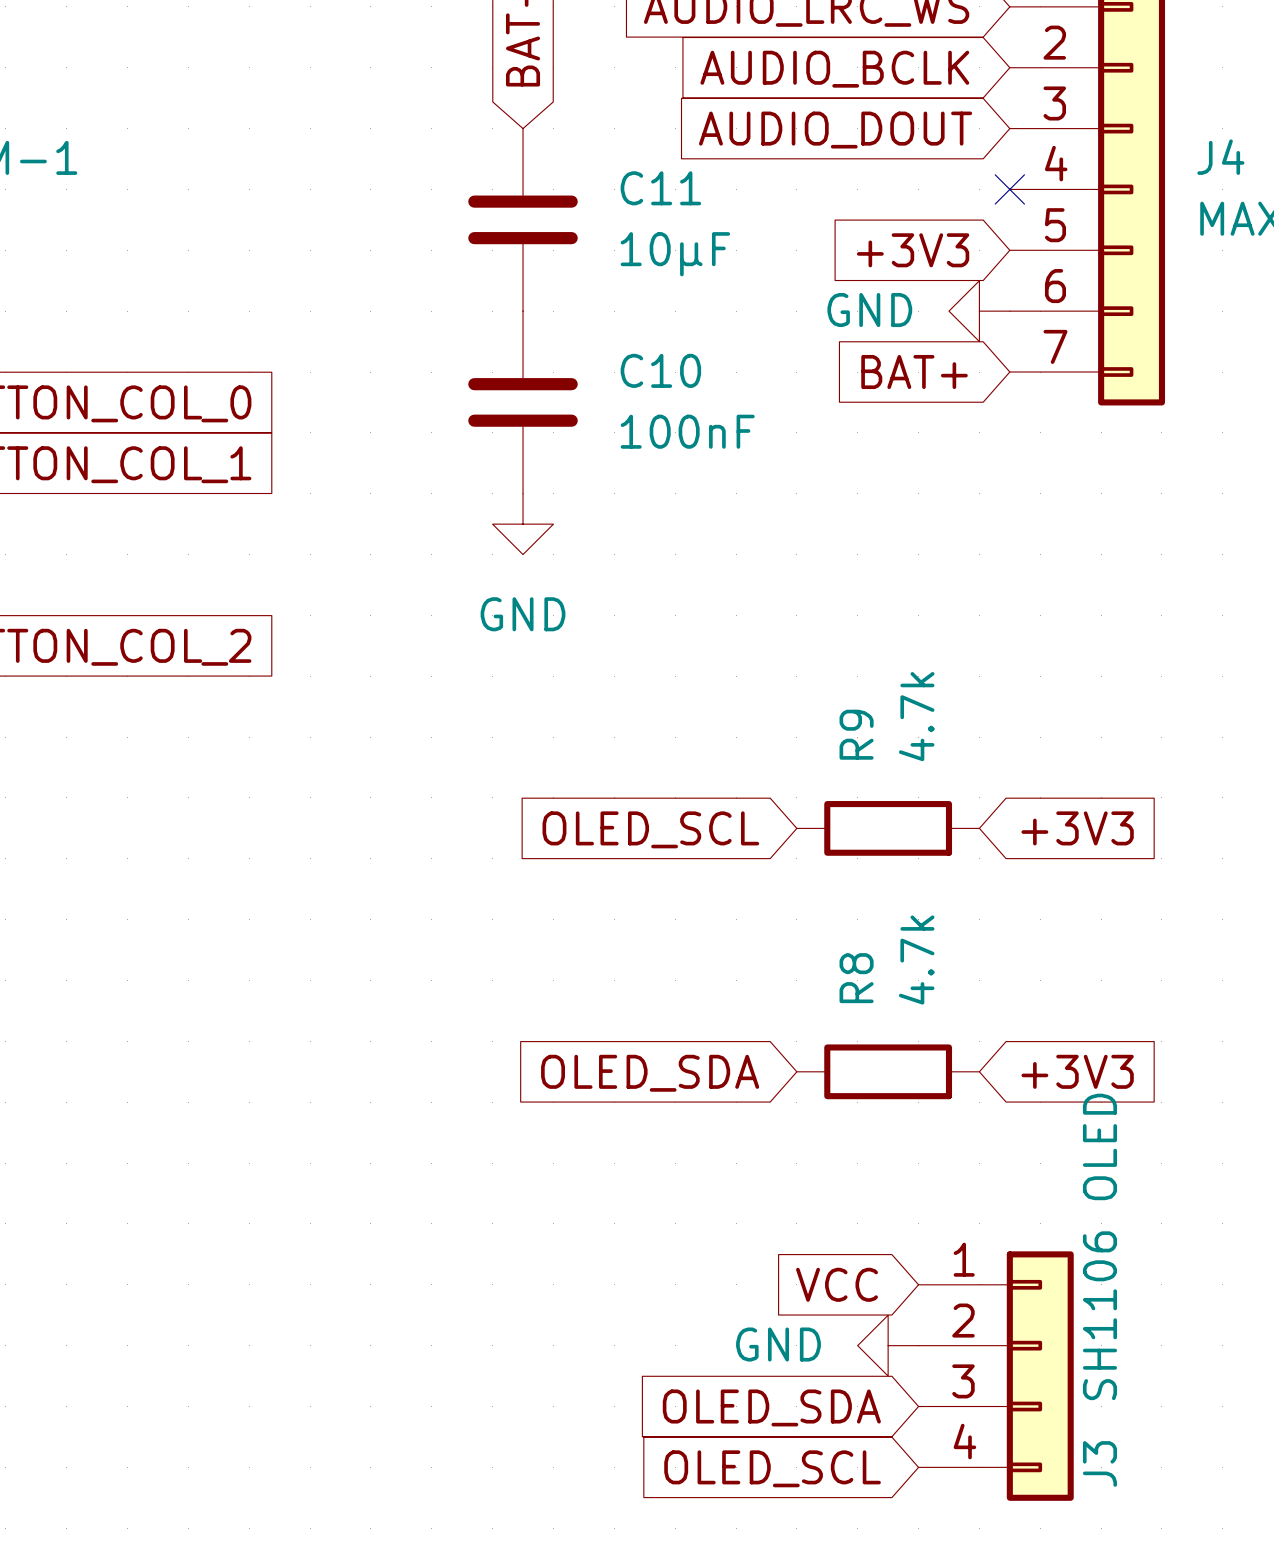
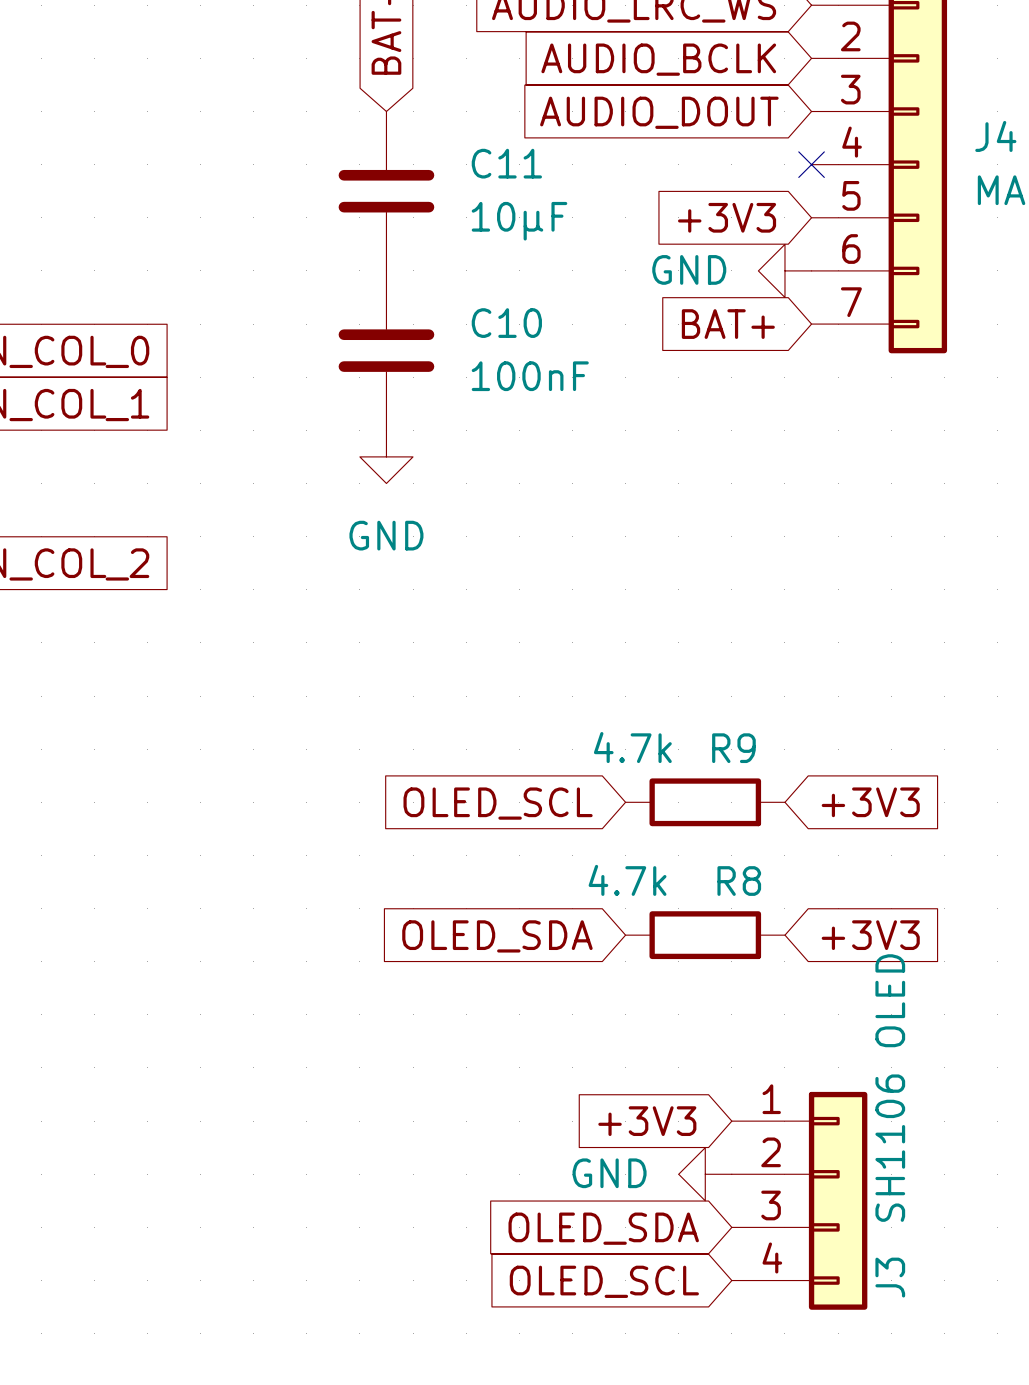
R9 value rotation: 0° (916, 716) -> 90° clockwise (632, 747)
R9 name rotation: 0° (856, 734) -> 90° clockwise (733, 748)
R9 name position: R9 (856, 734) -> R9 (733, 748)
R9 position: (888, 828) -> (705, 802)
global label position: +3V3 (1077, 828) -> +3V3 (870, 802)
global label position: OLED_SCL (650, 829) -> OLED_SCL (498, 803)
R8 value rotation: 0° (916, 960) -> 90° clockwise (627, 880)
R8 name rotation: 0° (856, 978) -> 90° clockwise (739, 881)
R8 name position: R8 (856, 978) -> R8 (739, 881)
global label: VCC (837, 1284) -> +3V3 (647, 1121)

